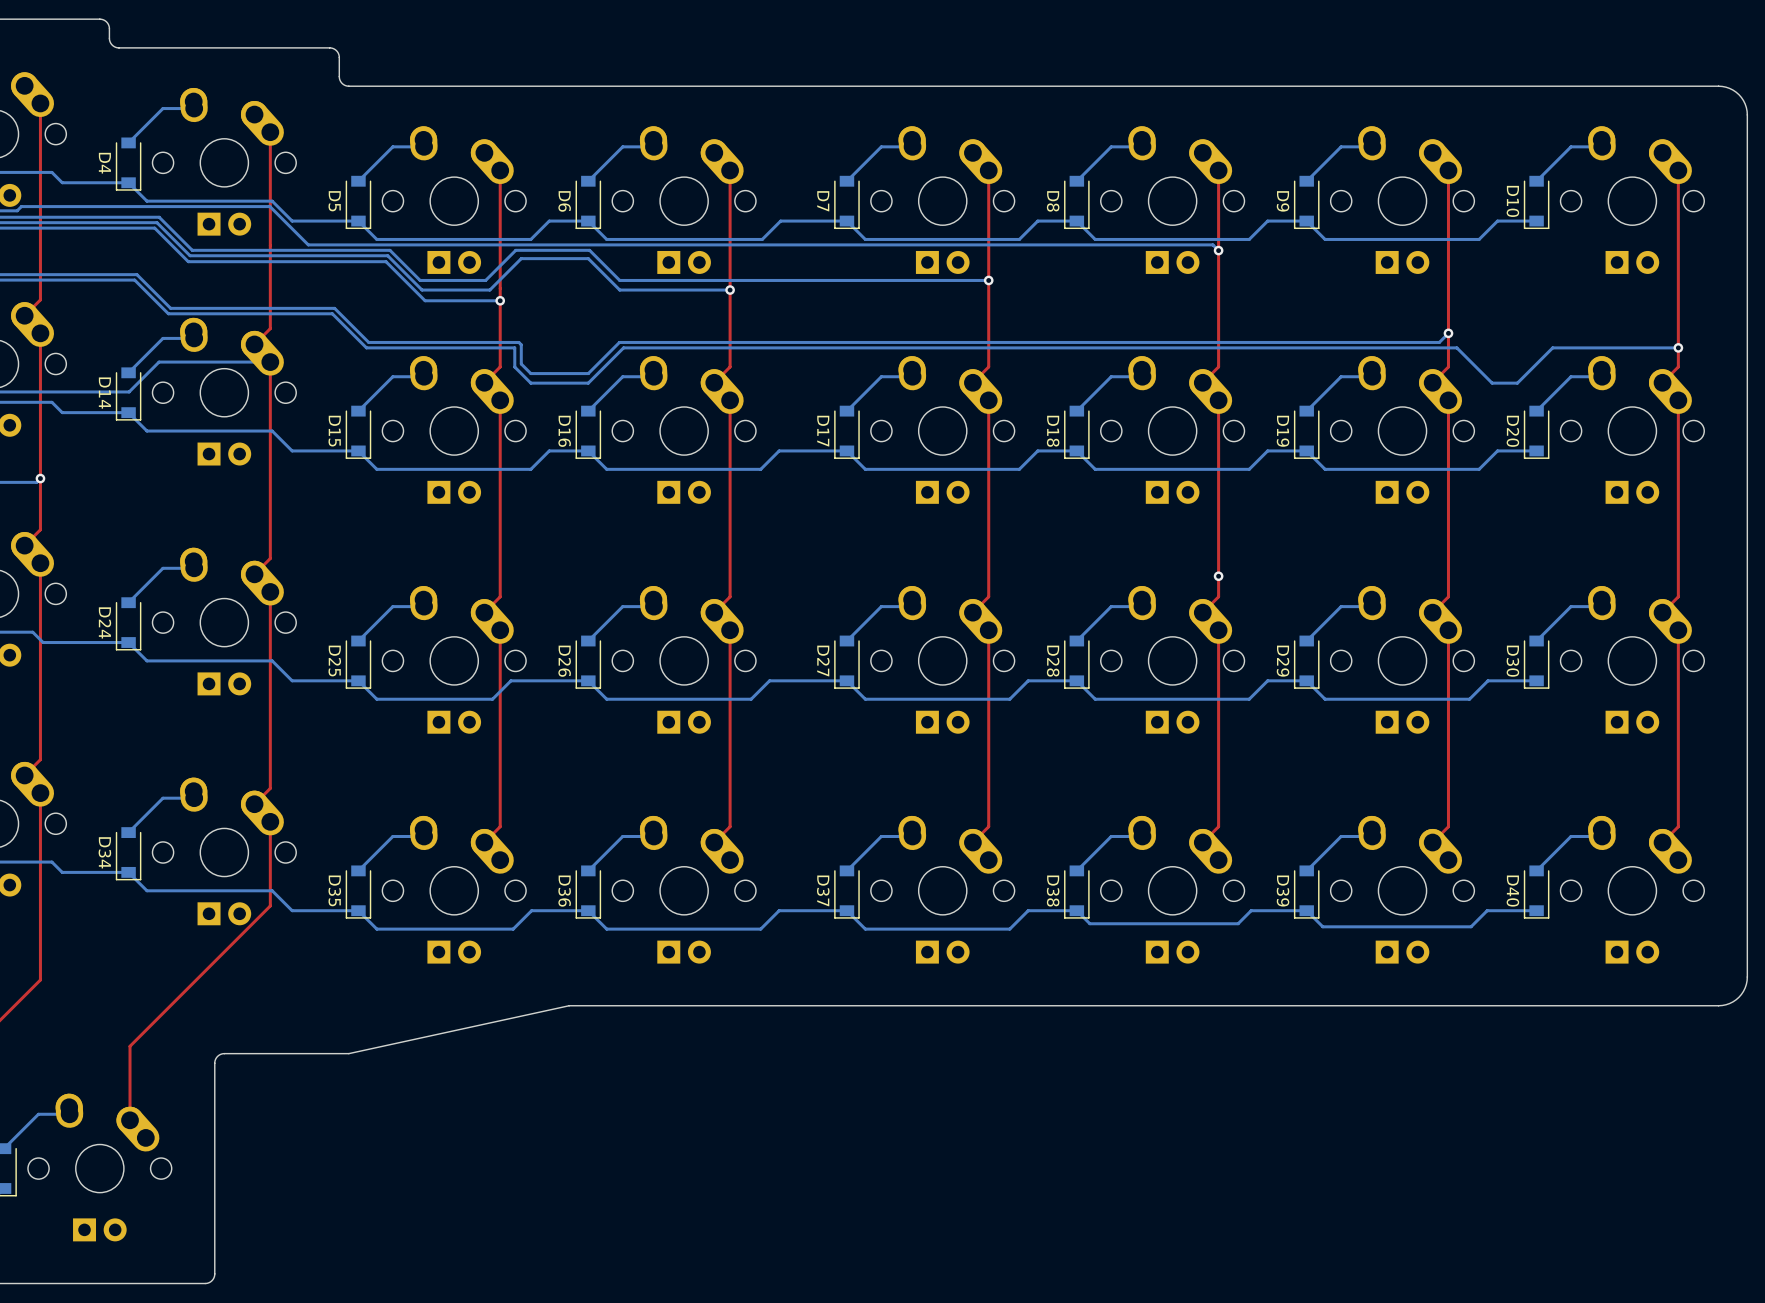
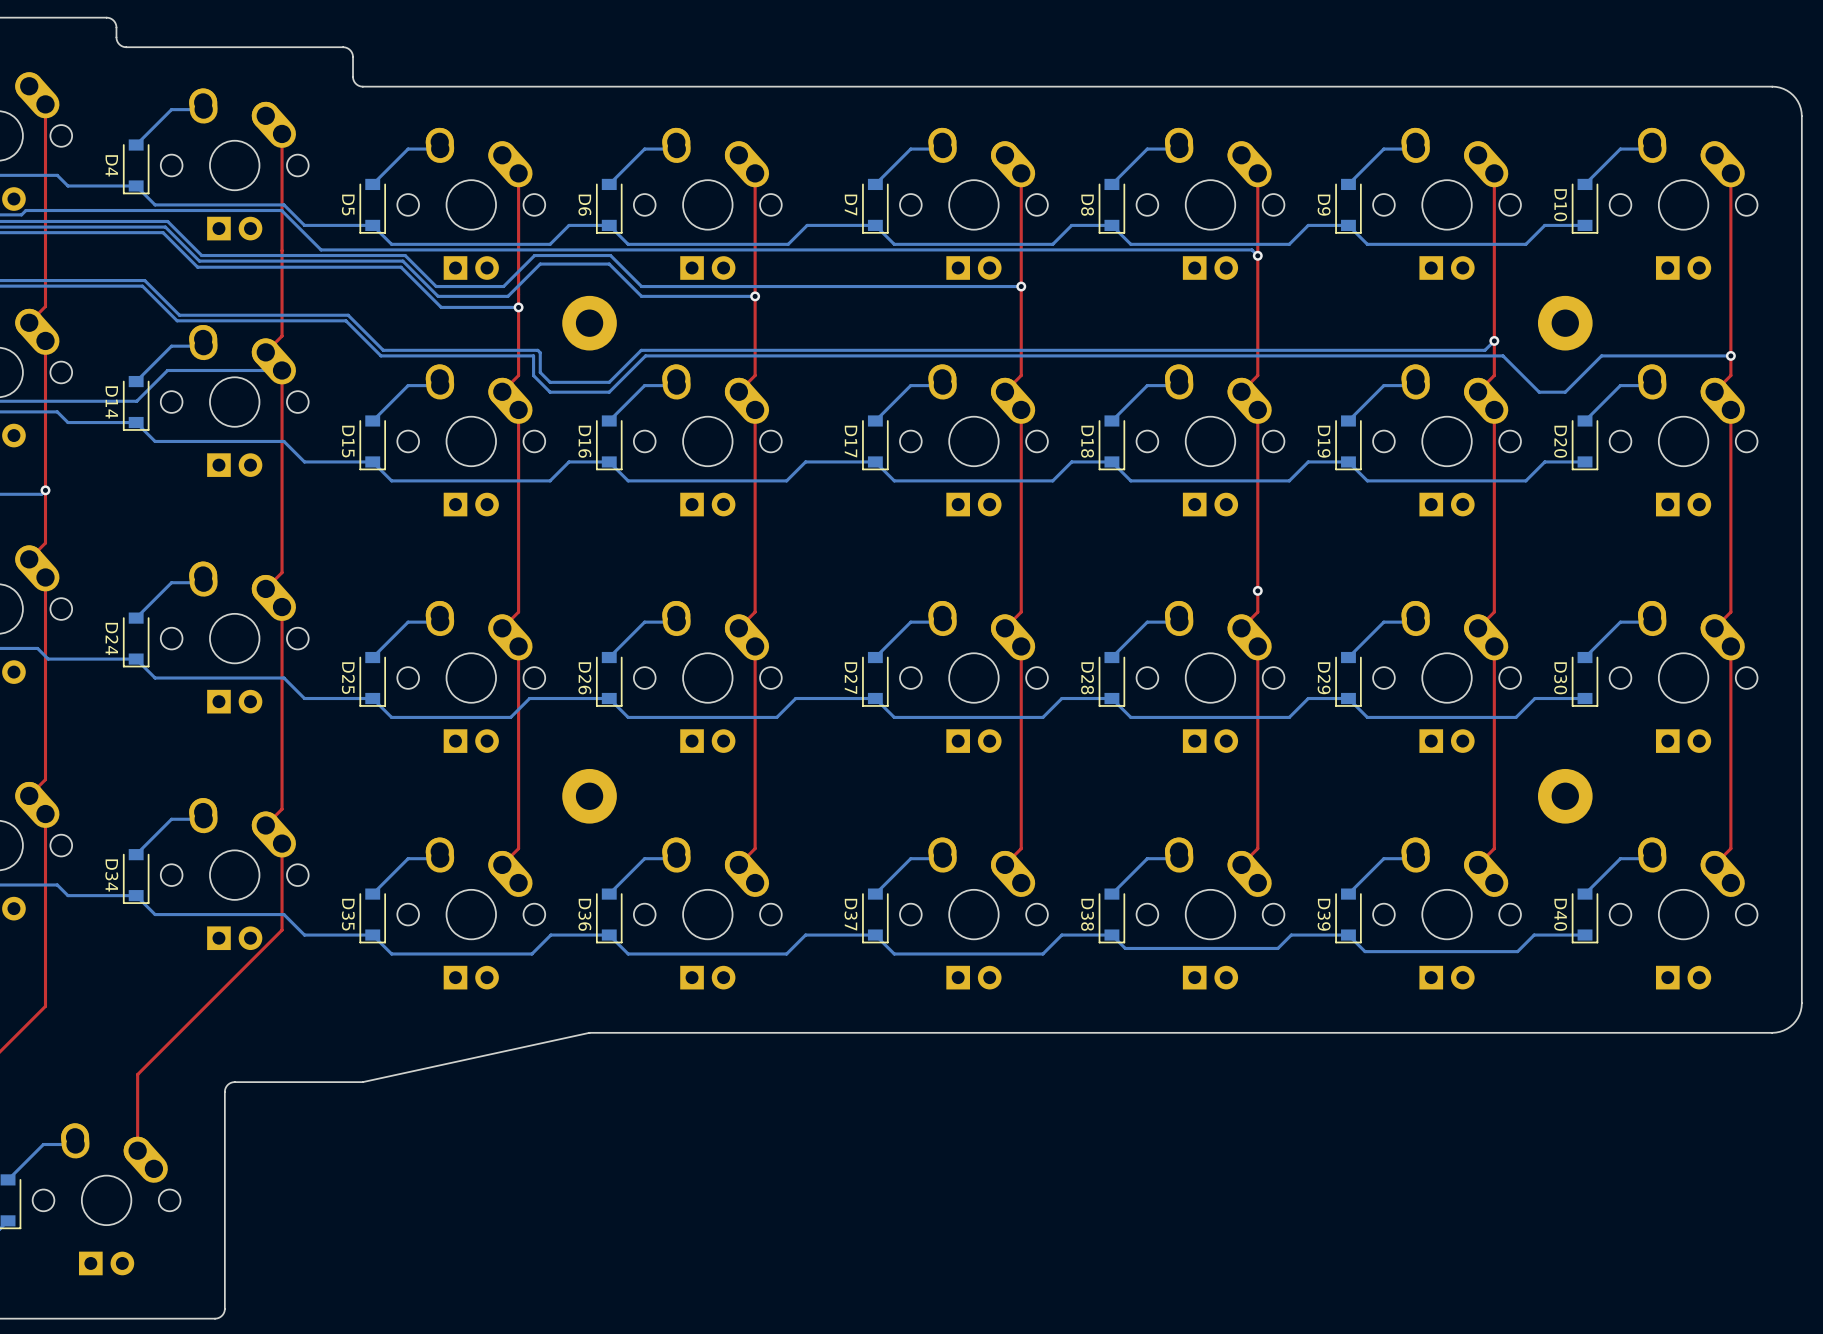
part: none -> (589, 323)
part: none -> (1565, 323)
part: none -> (589, 796)
part: none -> (1565, 796)

